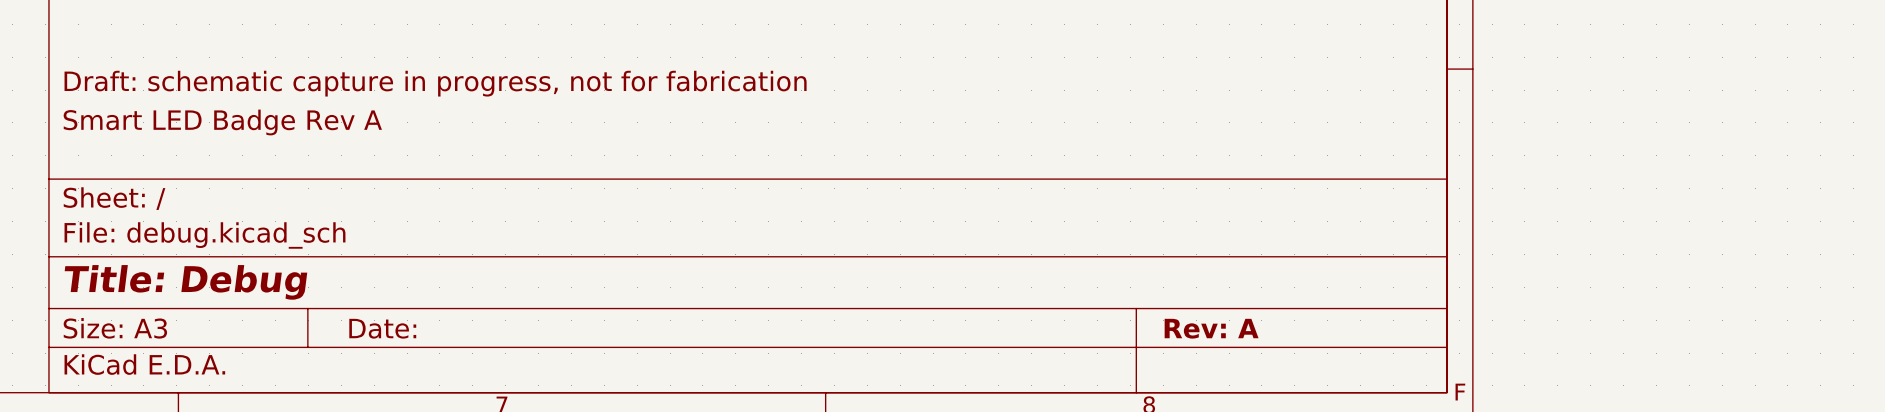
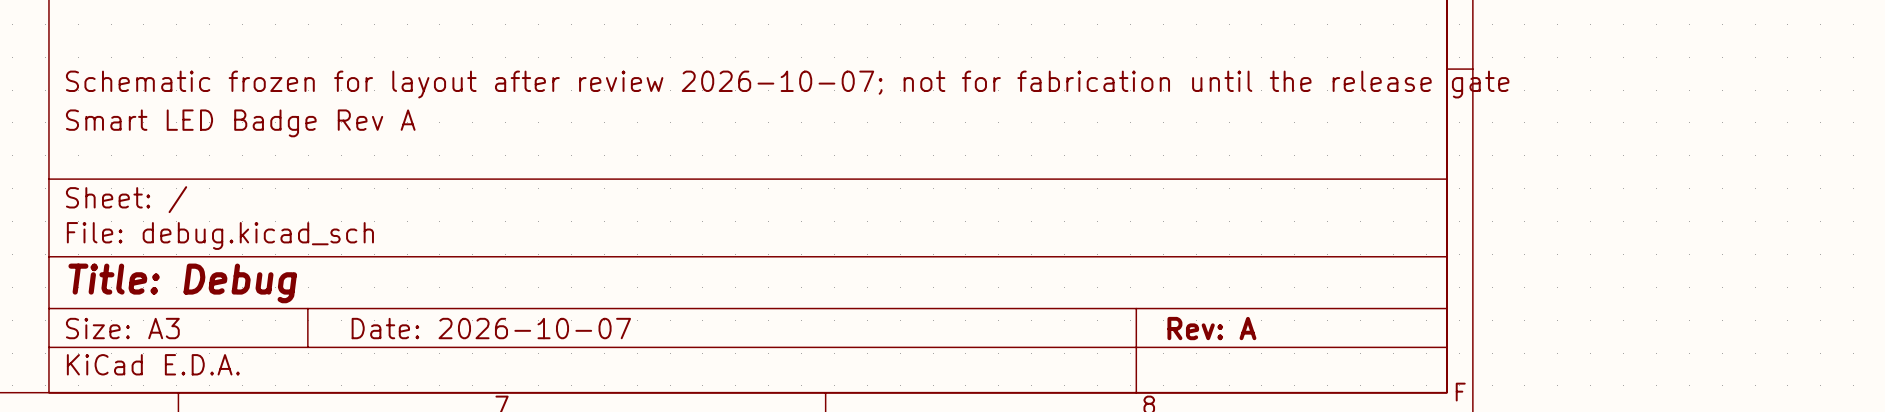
title block: Draft: schematic capture in progress, not for fabrication (435, 83) -> Schematic frozen for layout after review 2026-10-07; not for fabrication until the release gate (787, 84)
title block: Date: (382, 328) -> Date: 2026-10-07 (491, 328)

